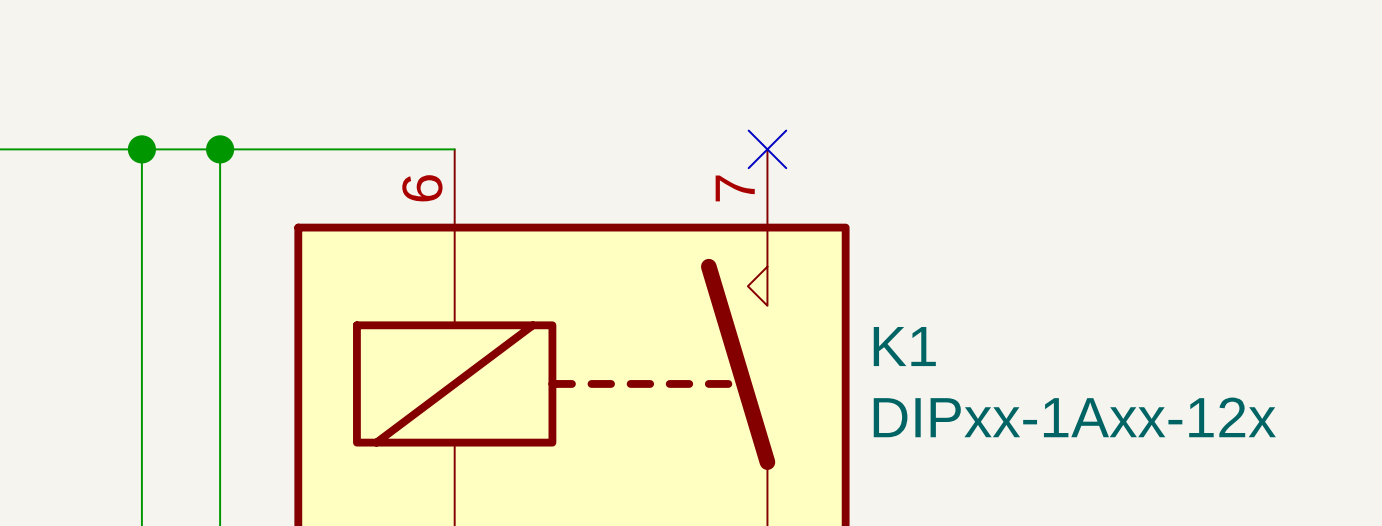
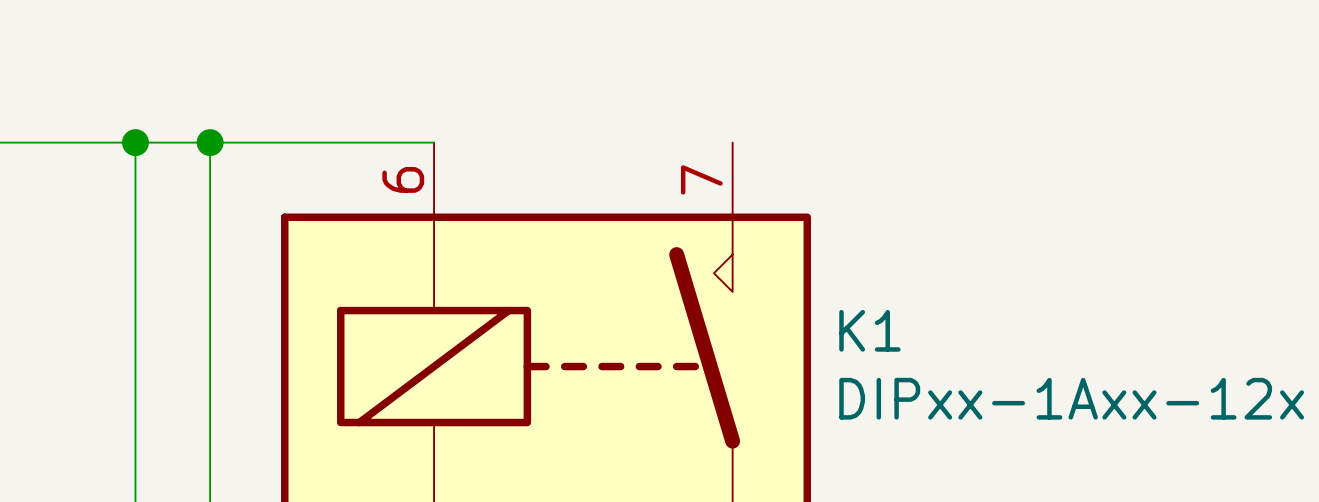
no-connect mark: (767, 149) -> none

